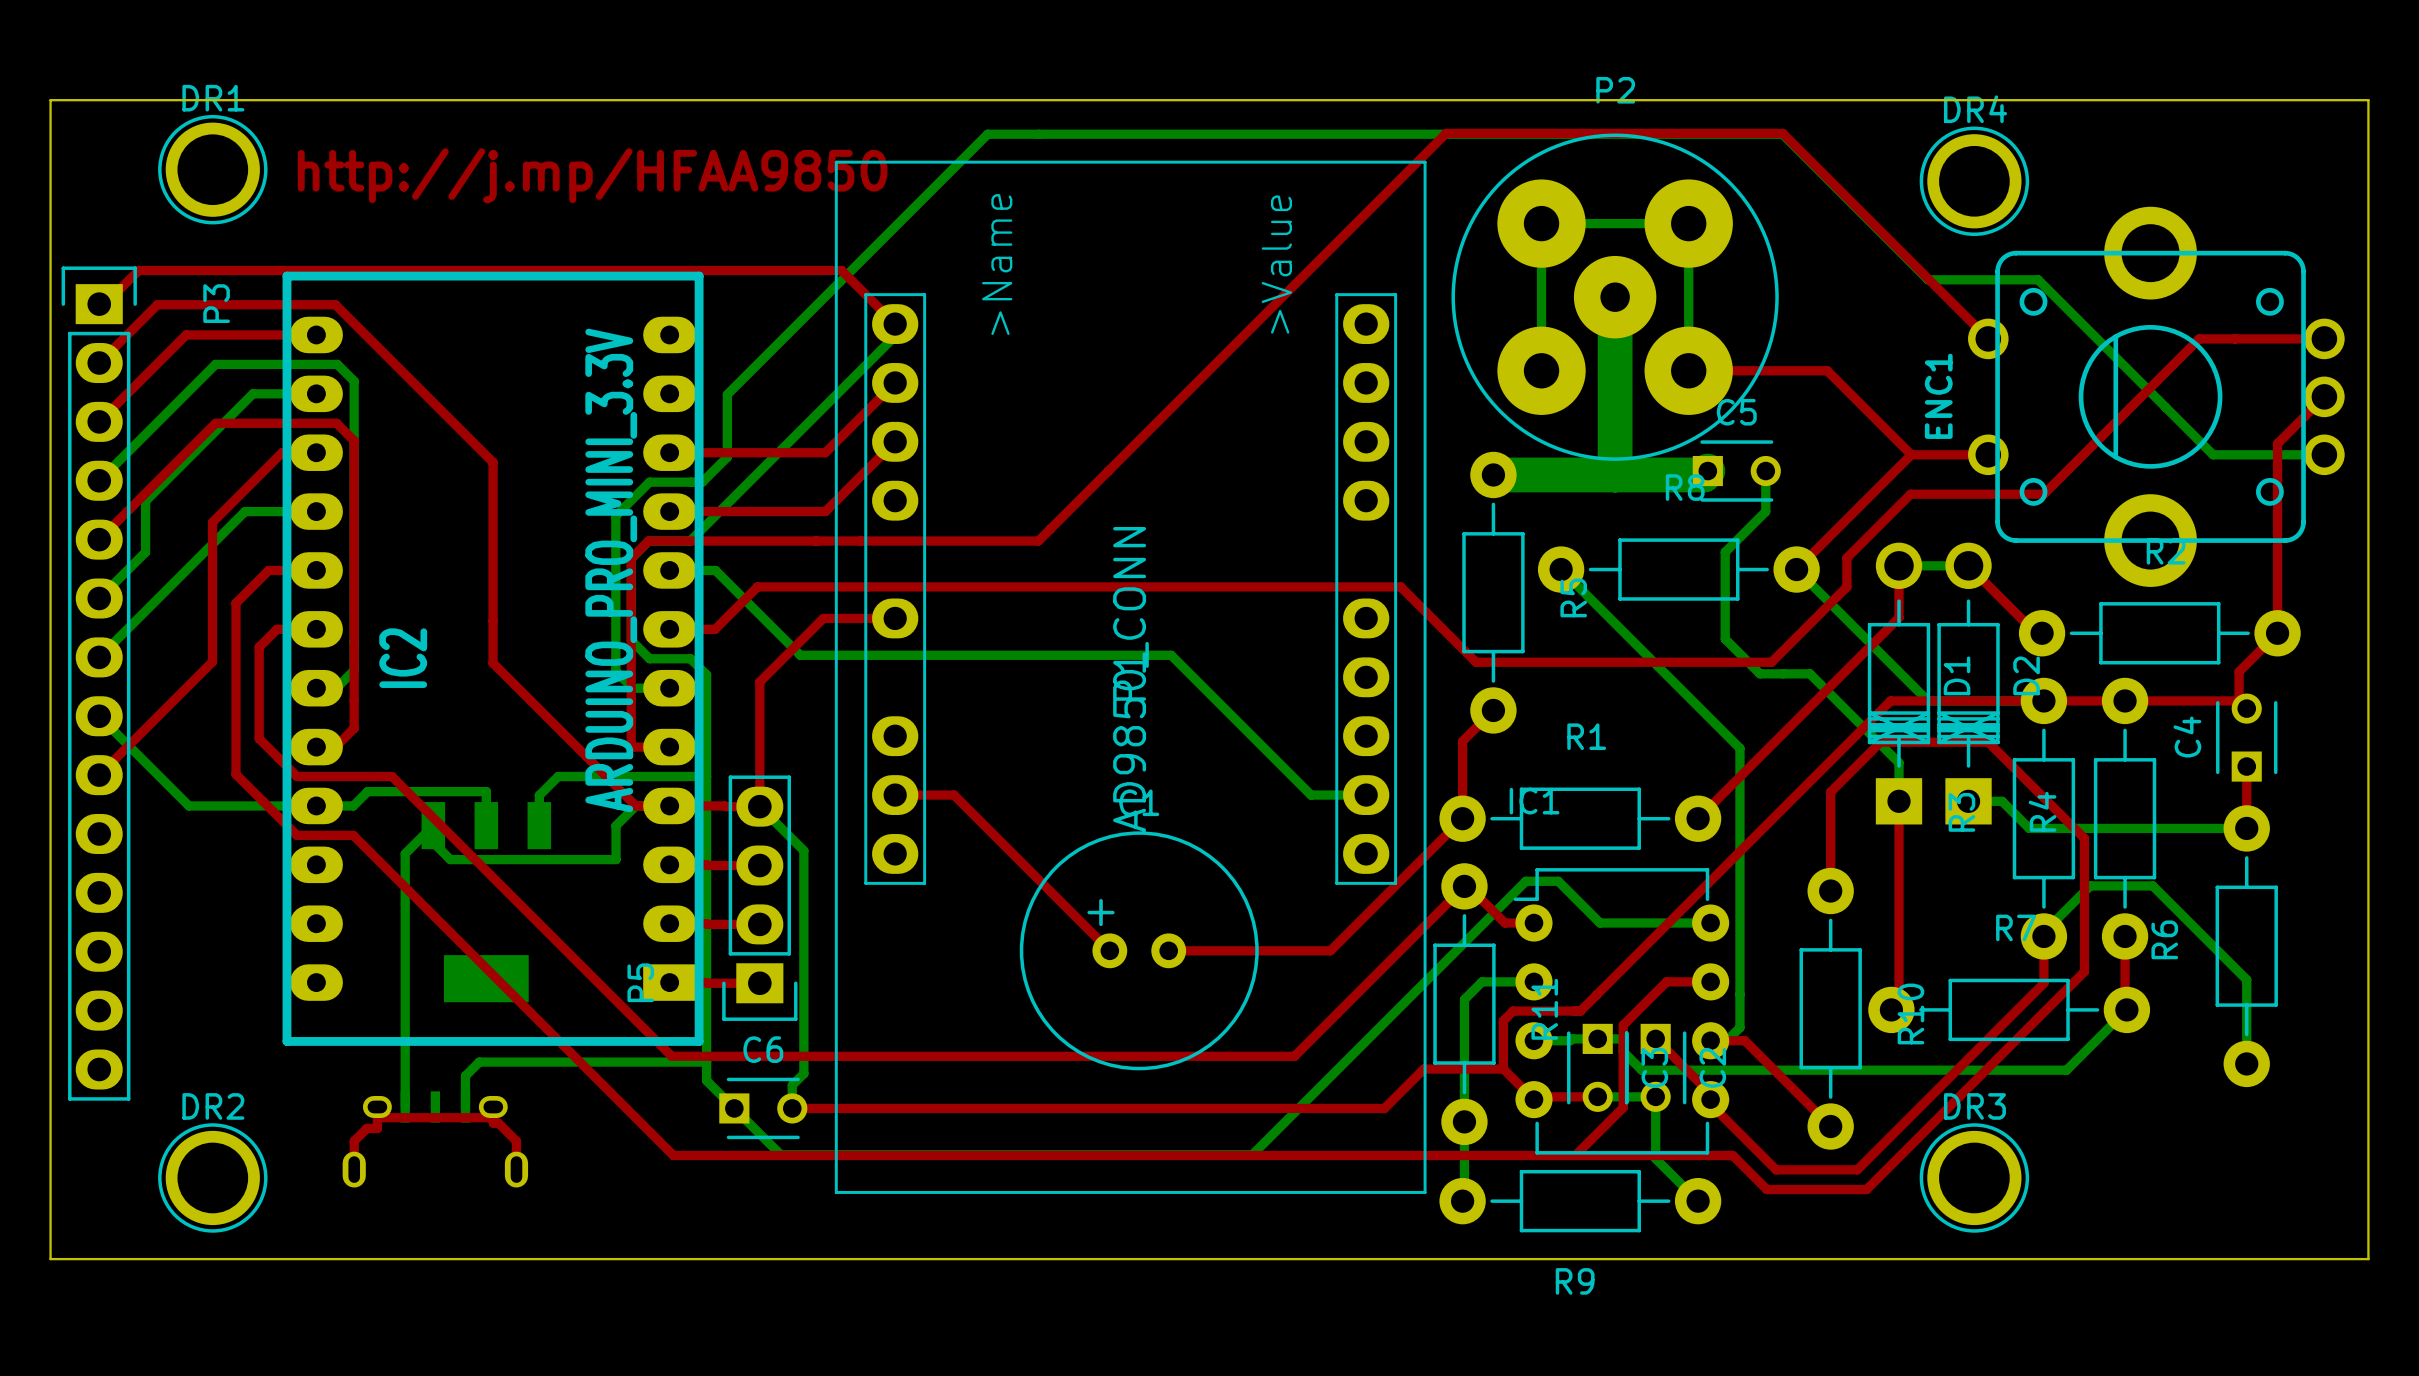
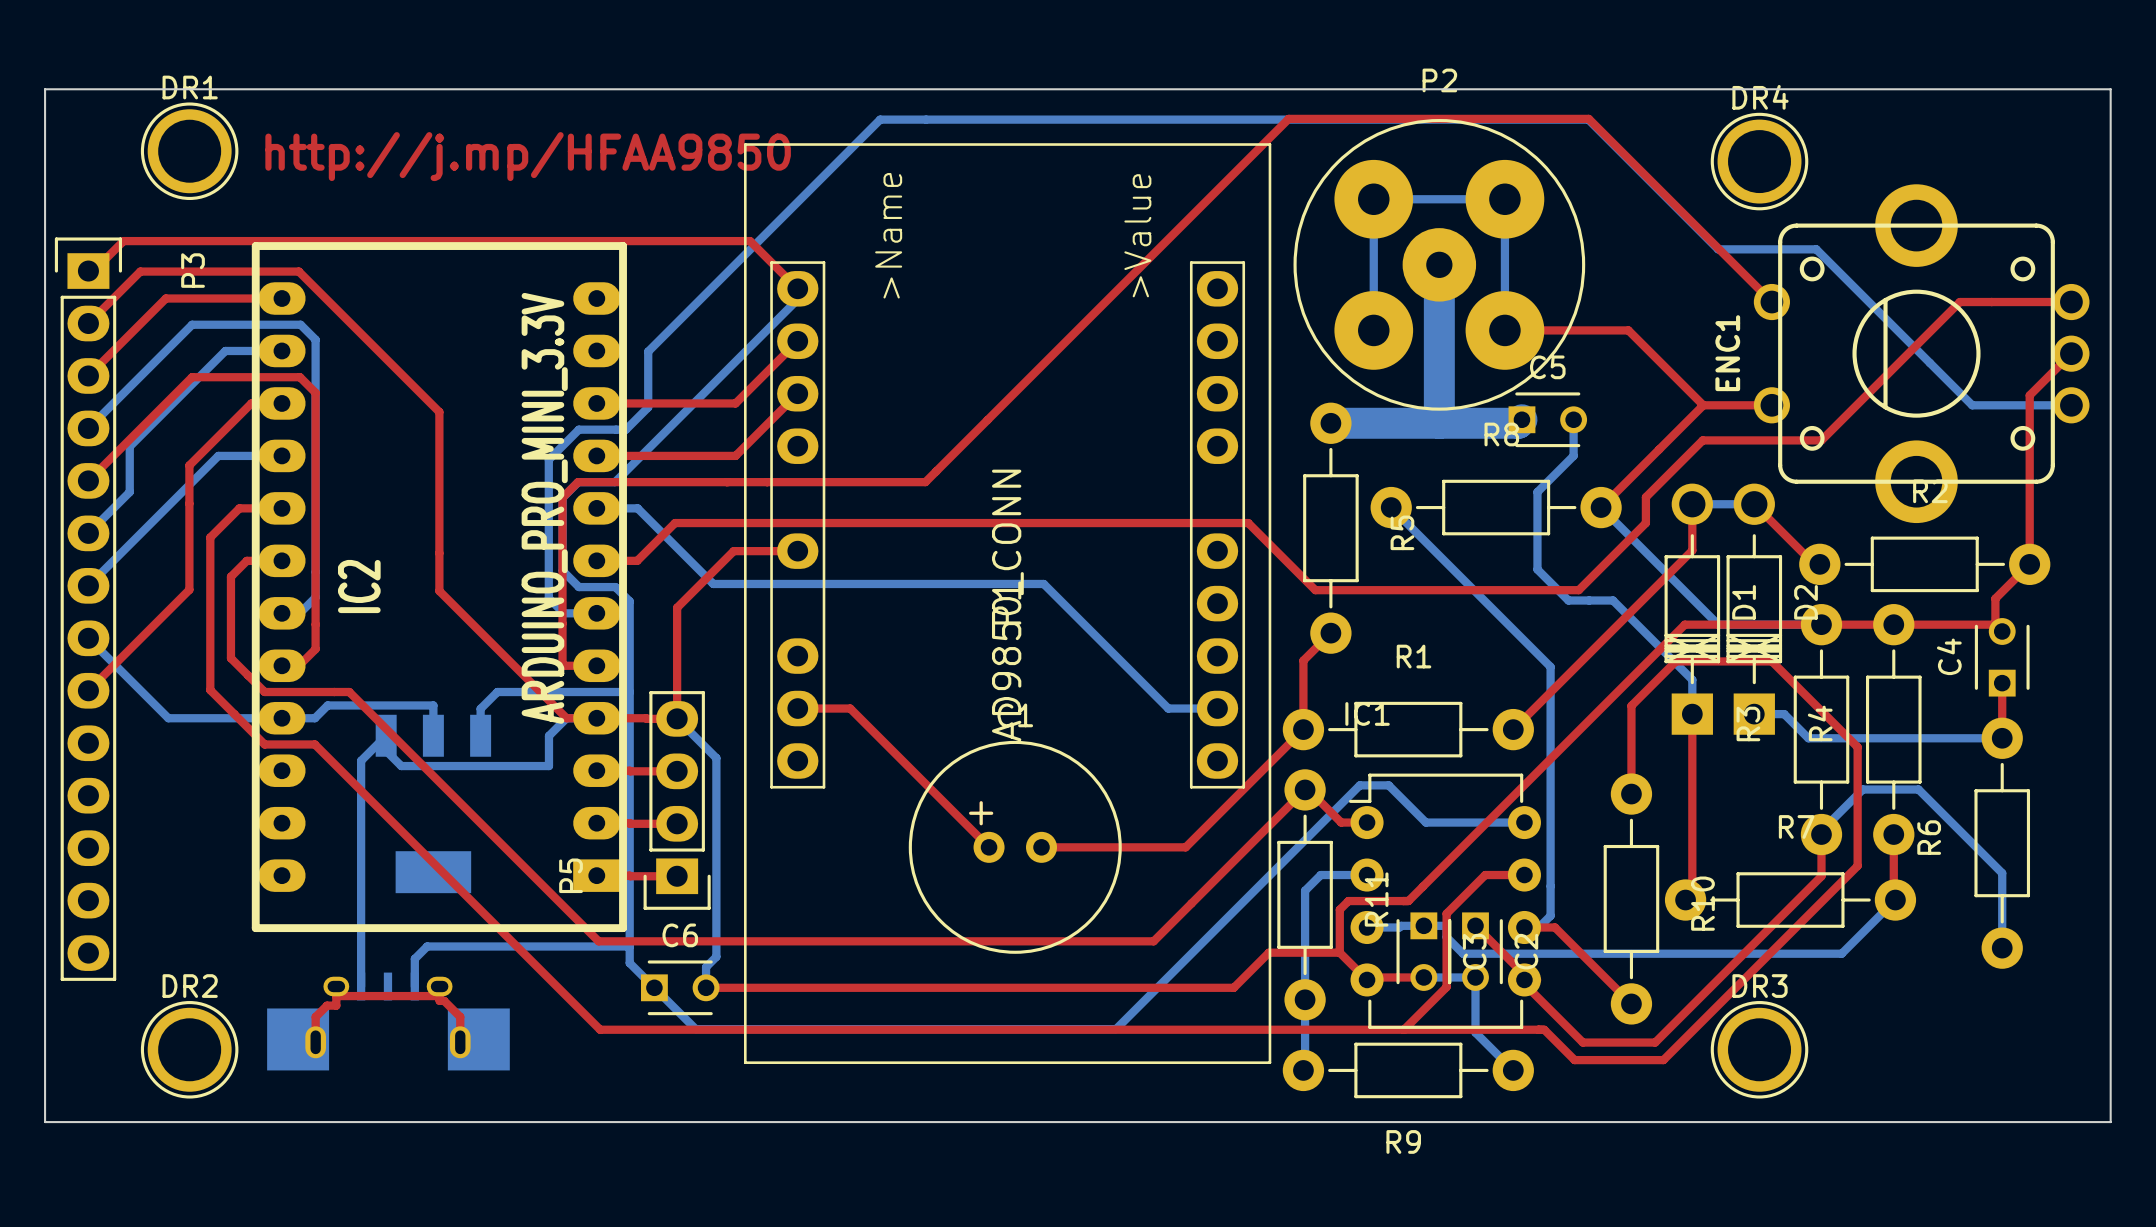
part: none -> (298, 1039)
part: none -> (478, 1039)

